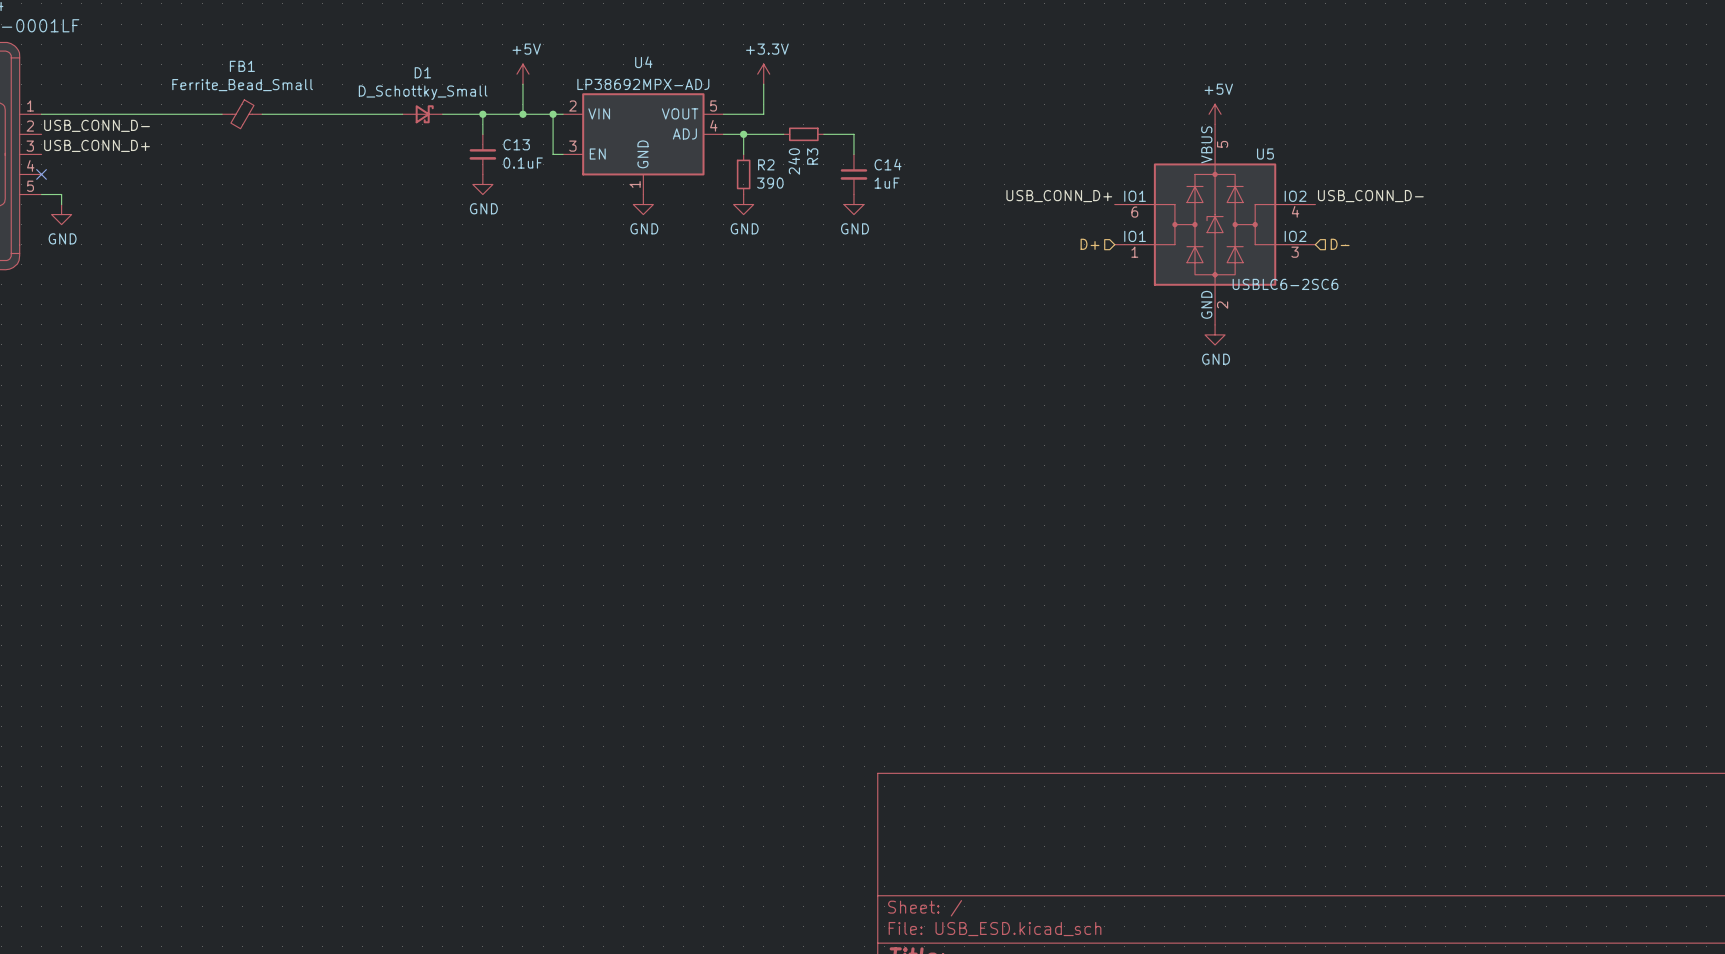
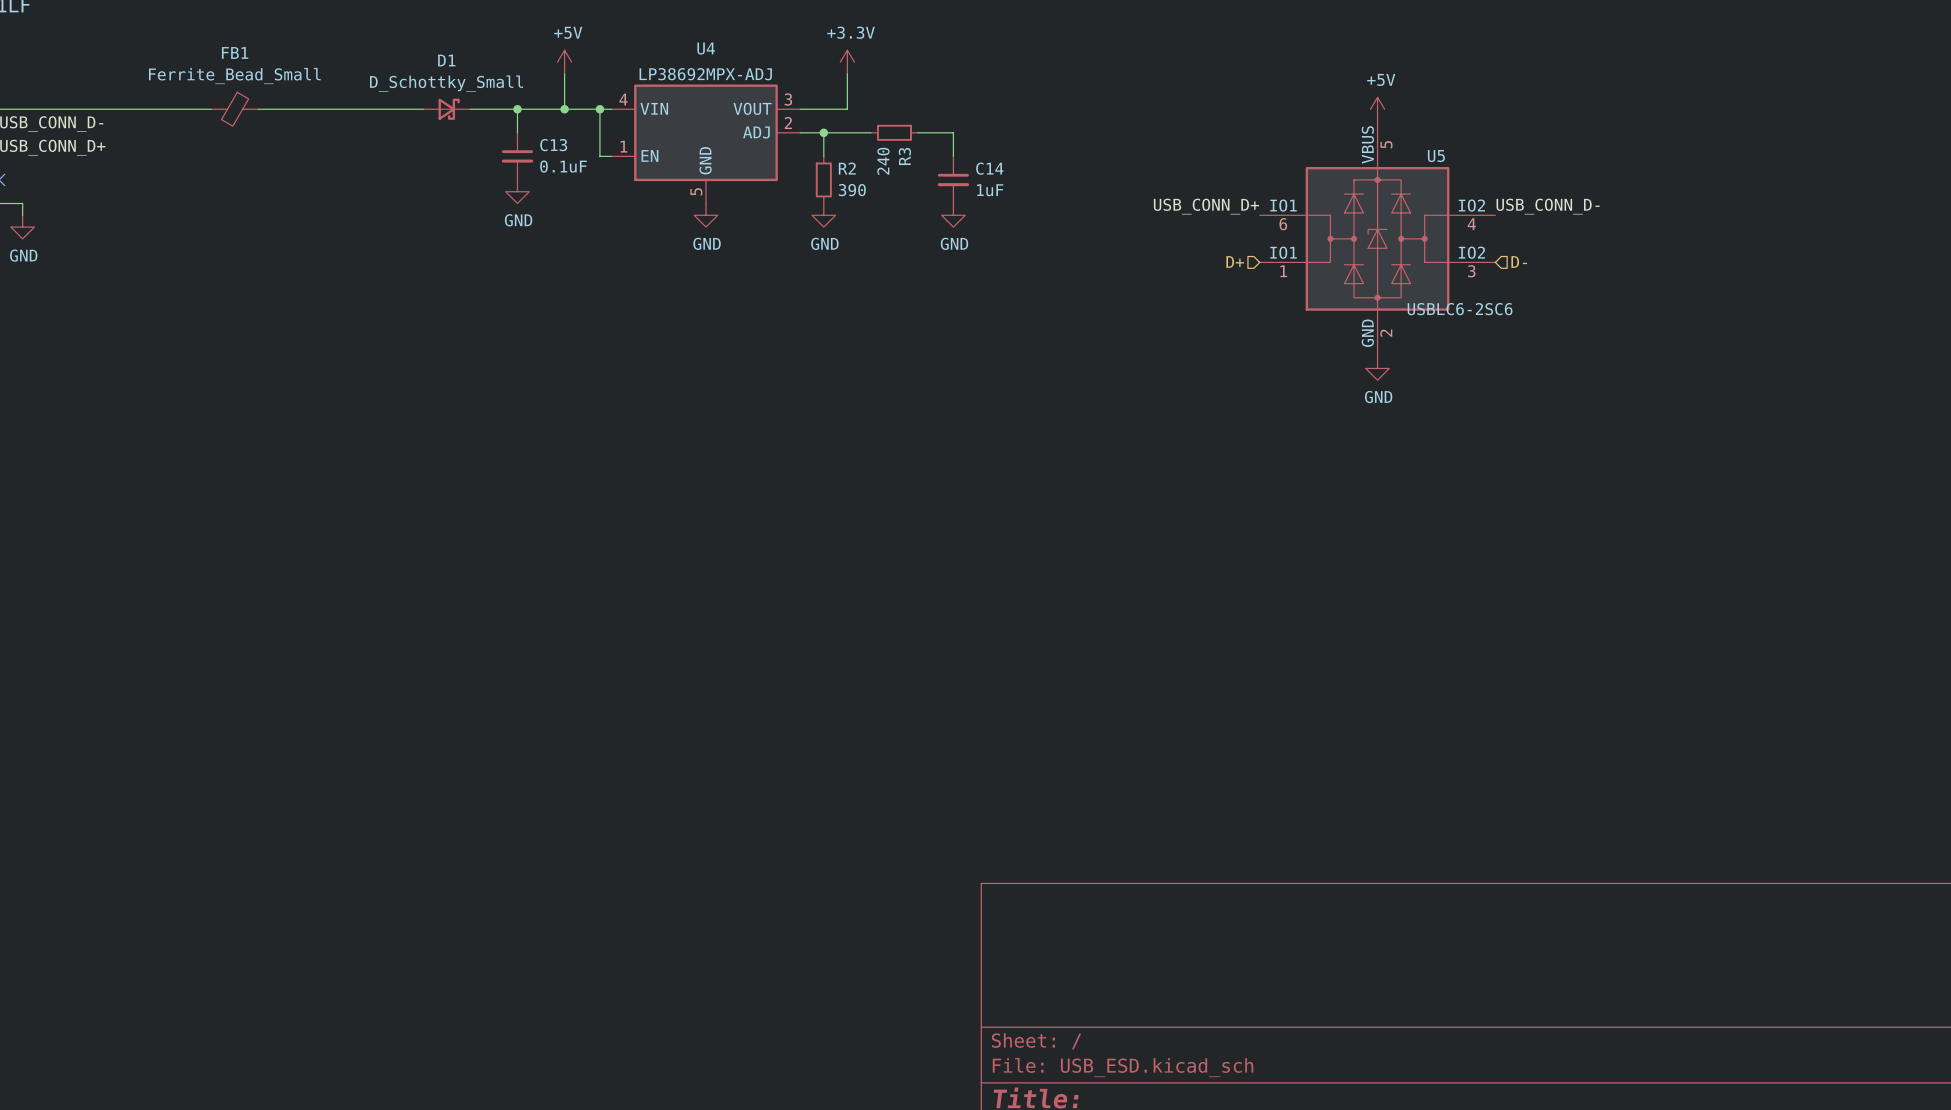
U4 pin number: 2 (572, 106) -> 4 (623, 99)
U4 pin number: 5 (713, 106) -> 3 (788, 99)
U4 pin number: 4 (713, 125) -> 2 (788, 122)
U4 pin number: 3 (572, 146) -> 1 (623, 146)
U4 pin number: 1 (635, 184) -> 5 (696, 191)

